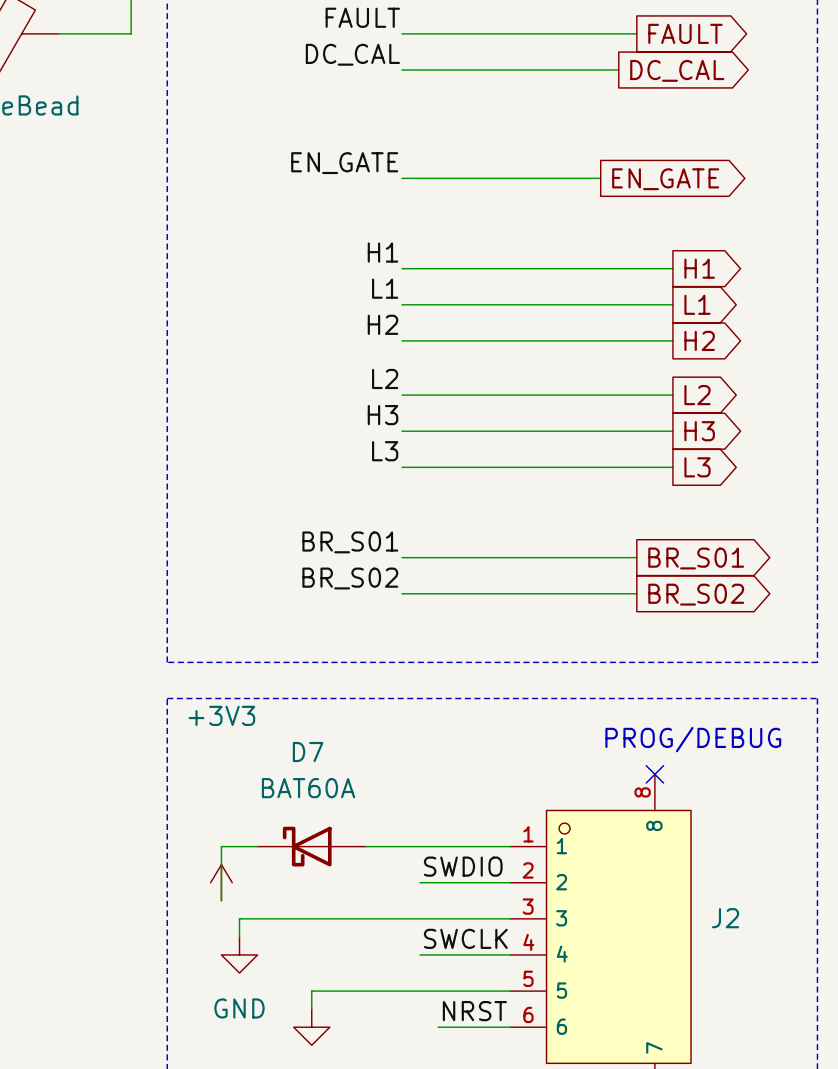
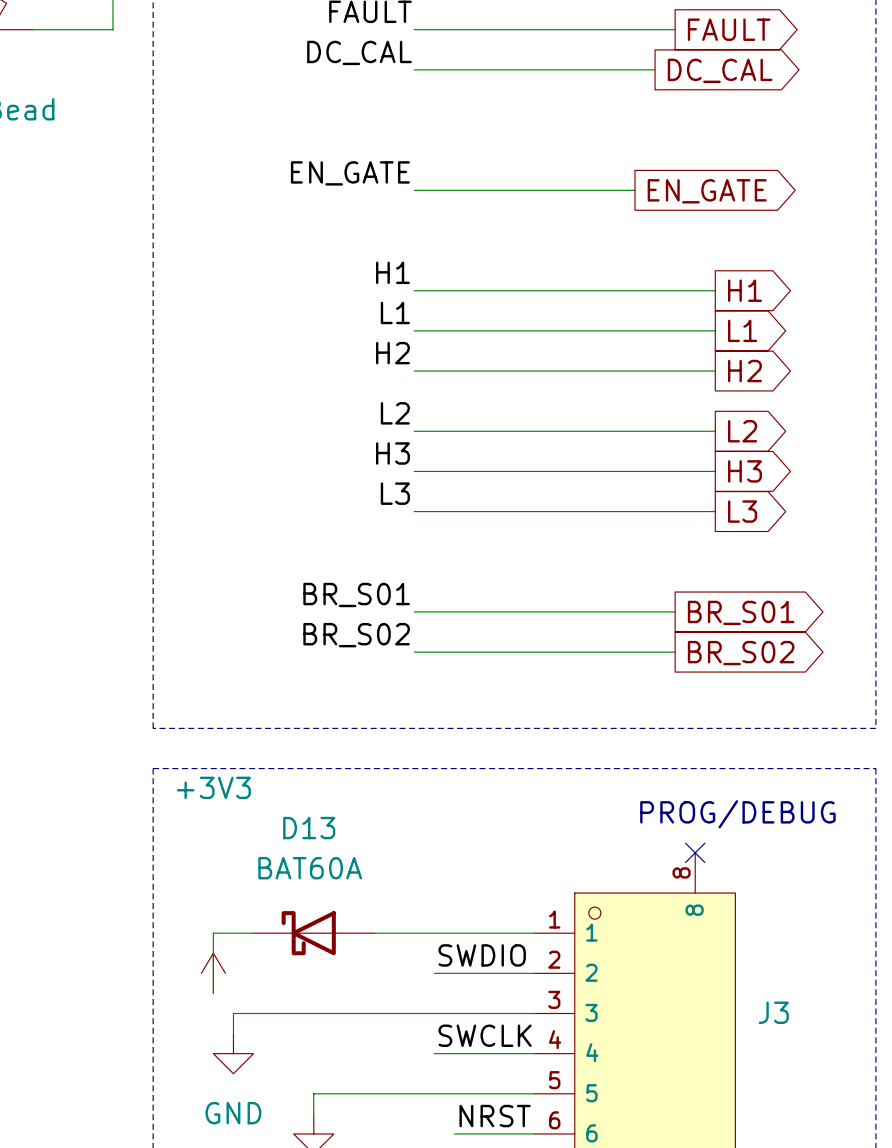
D7 name: D7 (308, 752) -> D13 (309, 828)
J2 name: J2 (725, 918) -> J3 (773, 1012)

